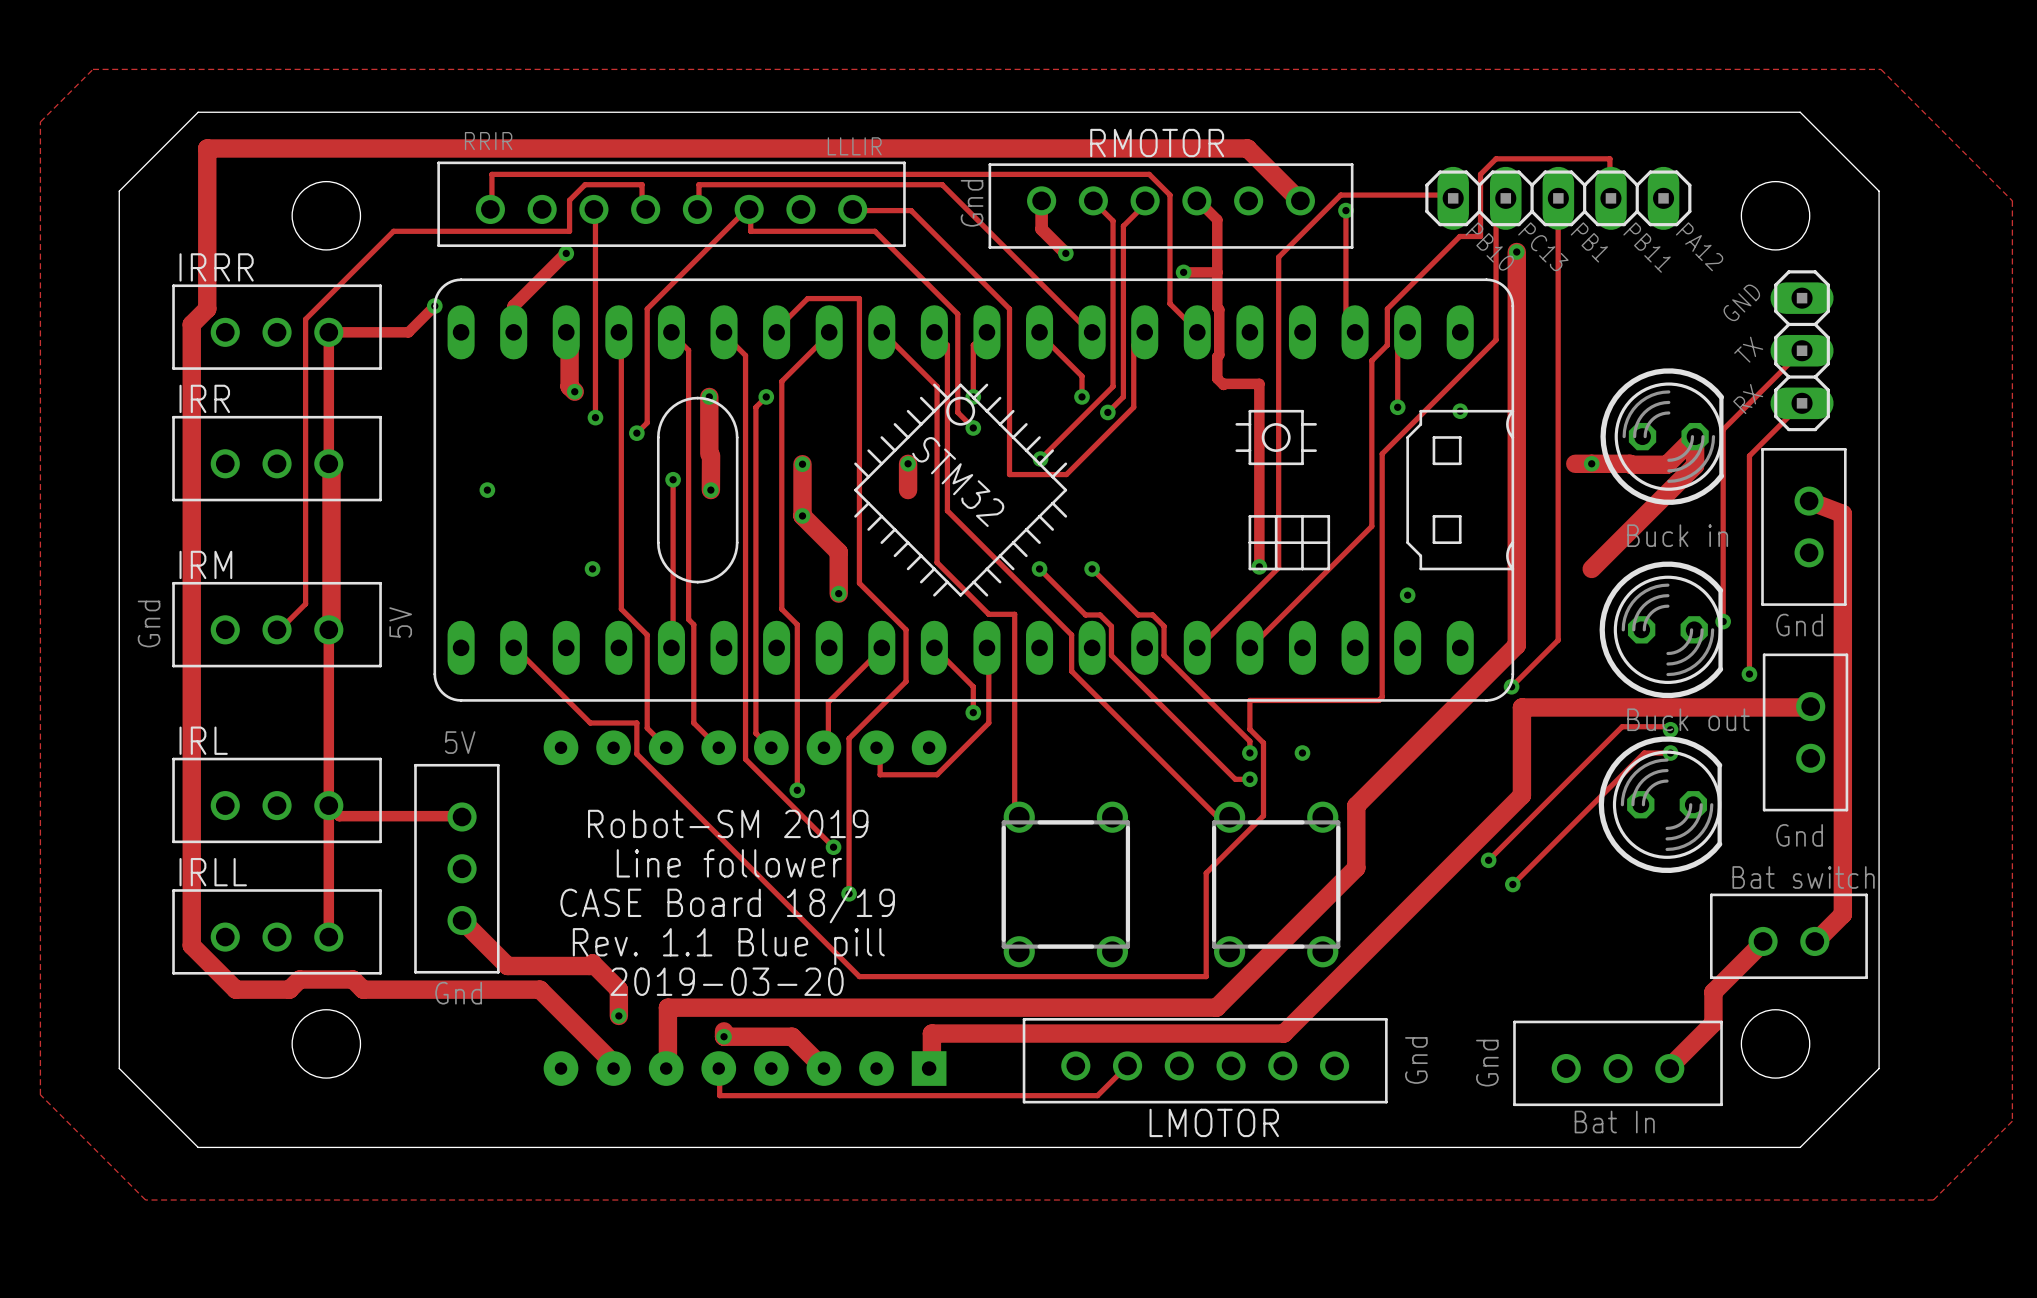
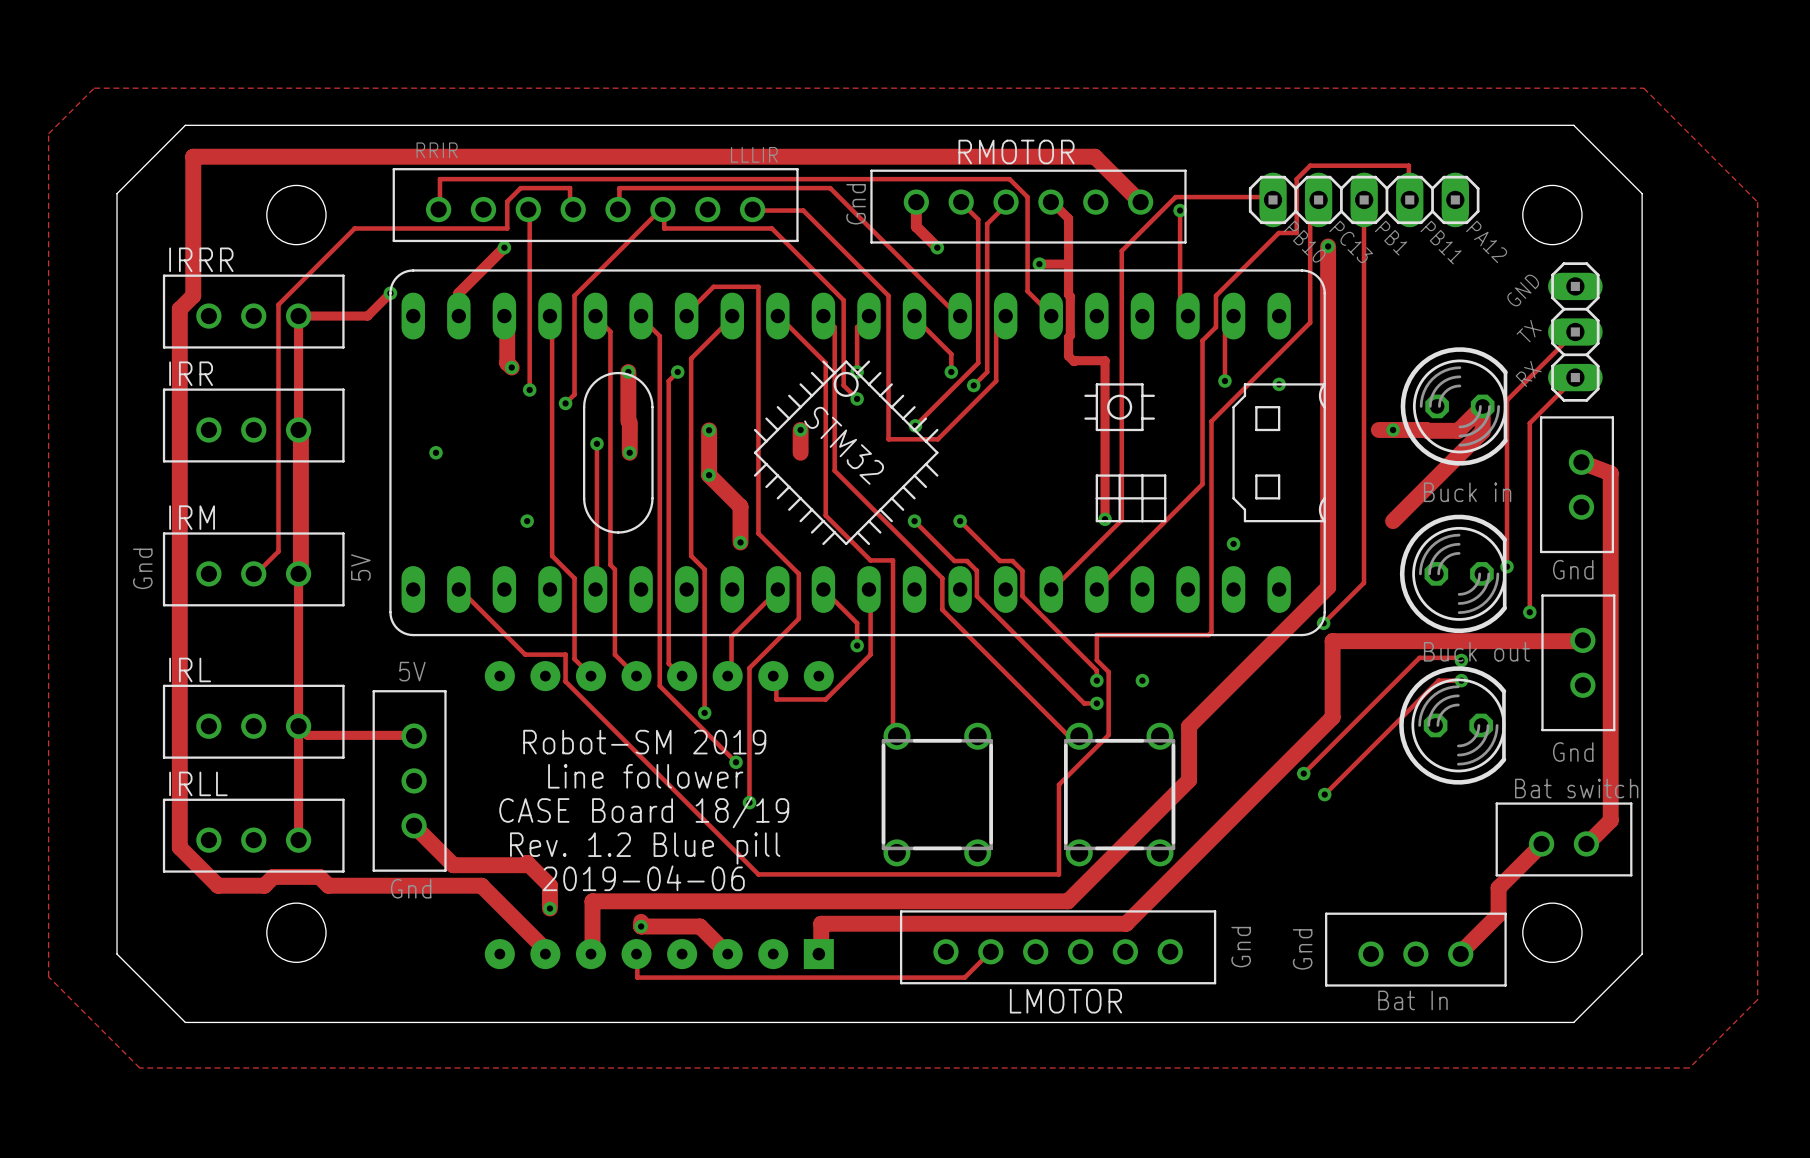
text: Rev. 1.1 Blue pill (728, 946) -> Rev. 1.2 Blue pill (645, 848)
text: 2019-03-20 (727, 981) -> 2019-04-06 (643, 878)

